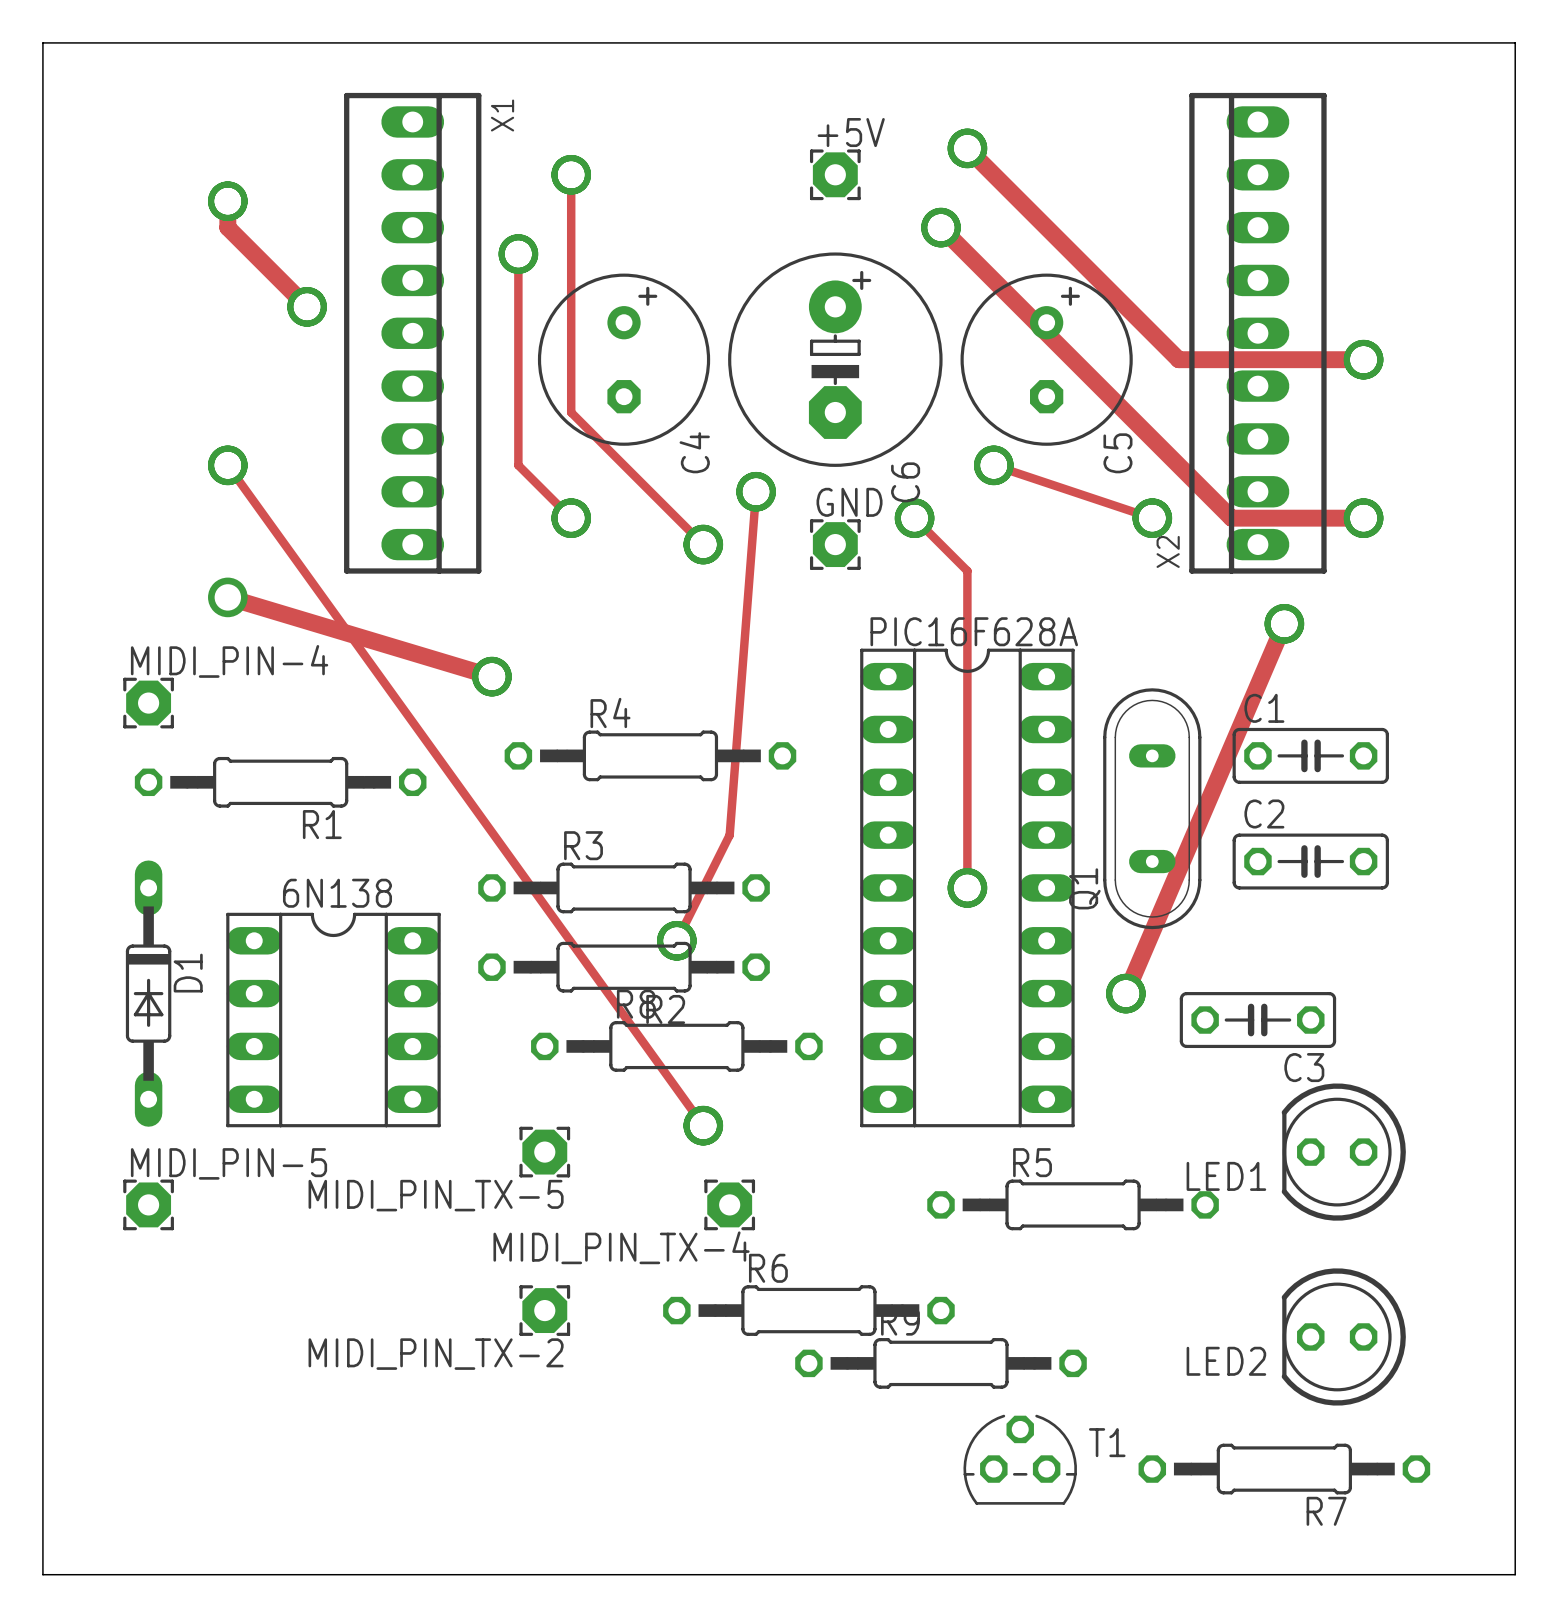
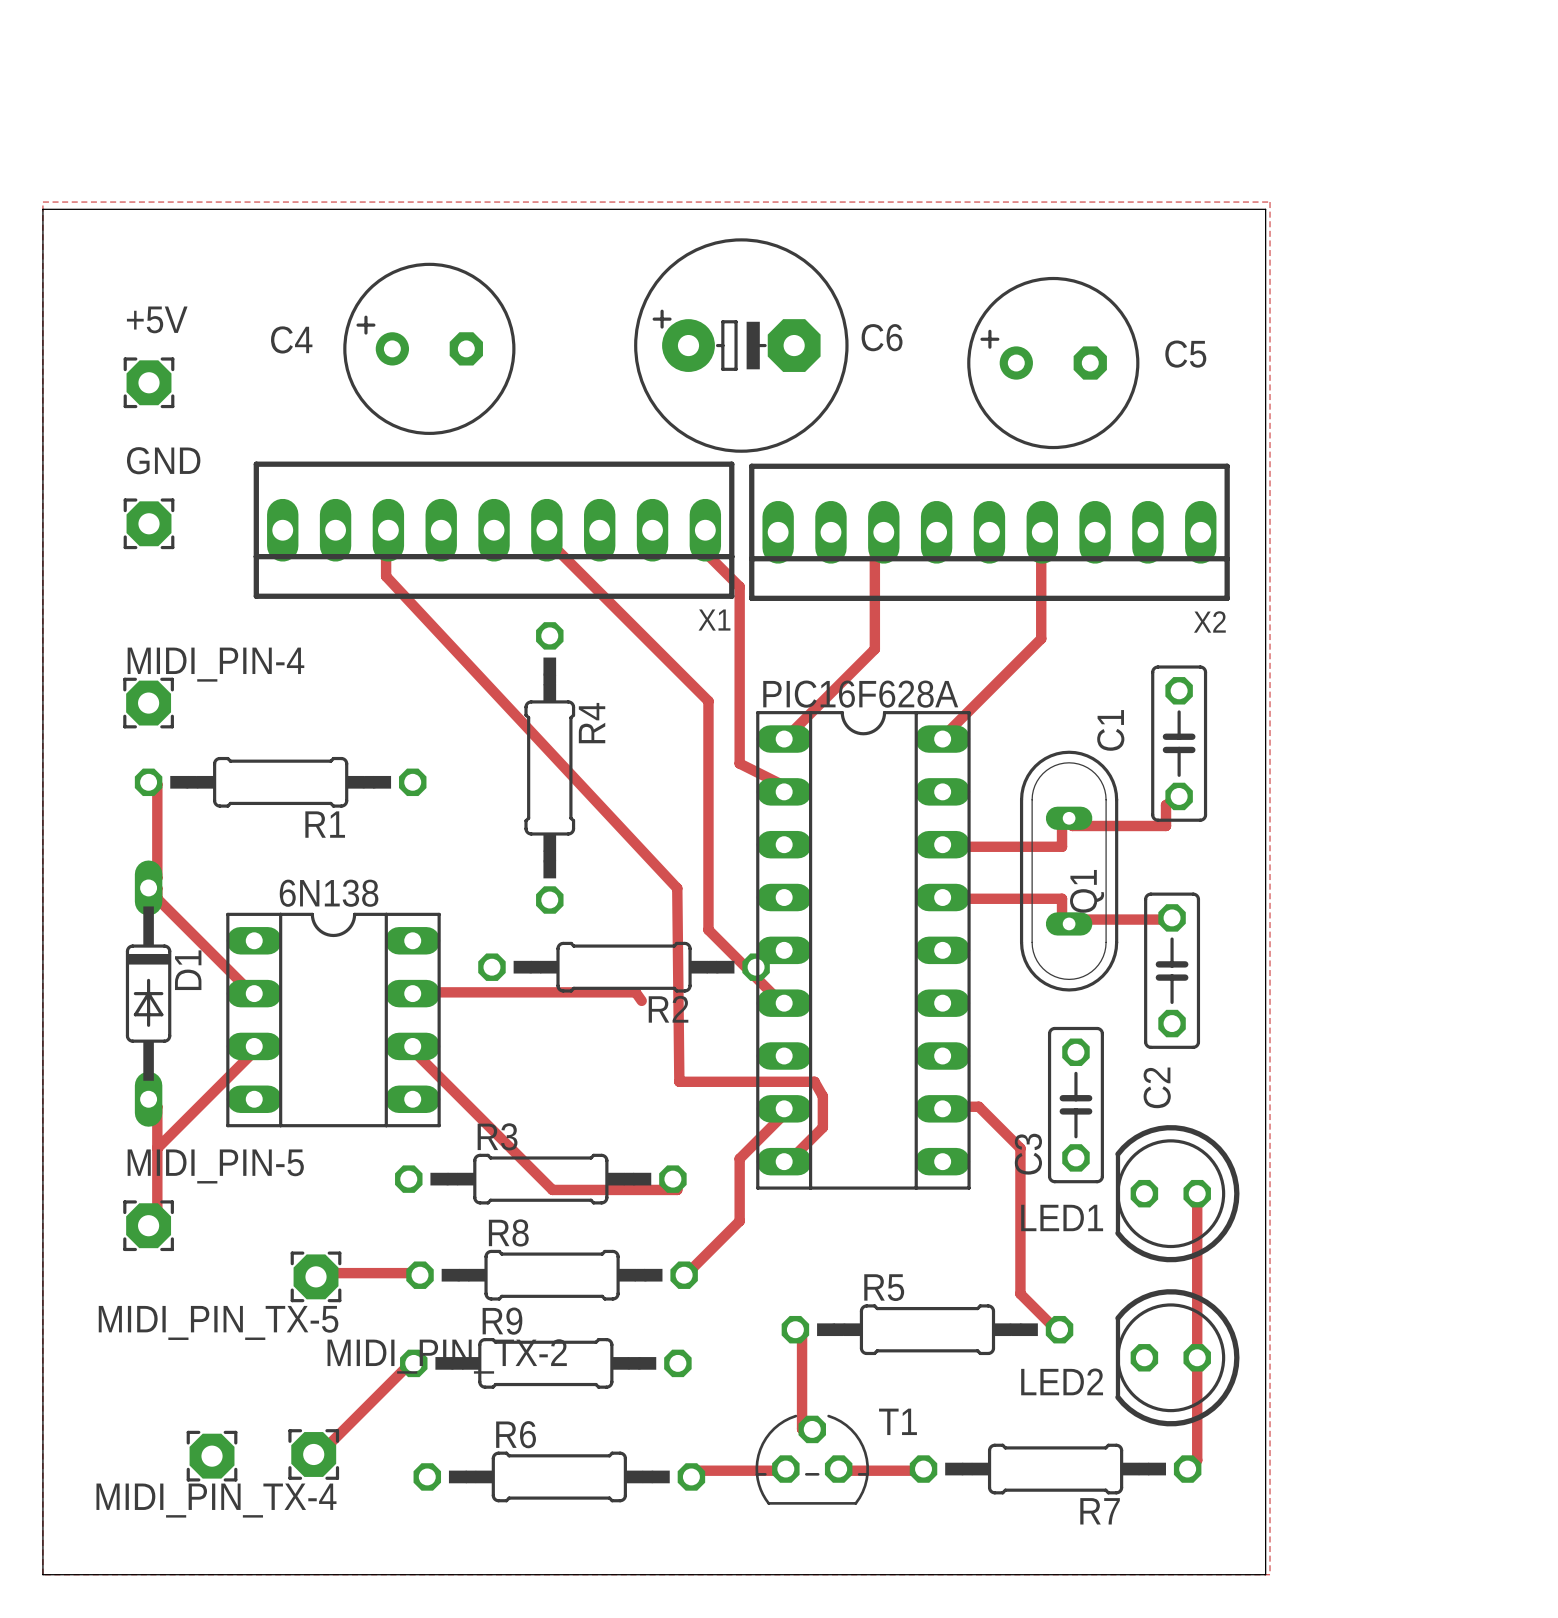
+5V name position: +5V (851, 132) -> +5V (157, 319)
track: (967, 148) (1178, 359) (1363, 359) -> none
via: (967, 148) -> none
track: (571, 174) (571, 412) (703, 544) -> none
via: (571, 174) -> none
+5V position: (835, 174) -> (149, 382)
track: (227, 201) (227, 227) (307, 306) -> none
via: (227, 201) -> none
zone outline: none -> (42, 202) (42, 1574) (1270, 1574) (1270, 202) (42, 202)
board edge: (42, 209) (42, 42) (1515, 42) (1515, 1574) (1265, 1574) -> (42, 209) (1265, 209) (1265, 1574)
track: (940, 227) (1231, 518) (1363, 518) -> none
via: (940, 227) -> none
track: (518, 254) (518, 465) (571, 518) -> none
via: (518, 254) -> none
via: (307, 306) -> none
X1 rotation: 0° (412, 333) -> 90° clockwise (494, 530)
X2 rotation: 0° (1257, 333) -> 90° counterclockwise (989, 532)
X2 position: (1257, 333) -> (989, 532)
C4 rotation: 0° (624, 359) -> 90° counterclockwise (429, 348)
C4 position: (624, 359) -> (429, 348)
C6 rotation: 0° (835, 359) -> 90° counterclockwise (741, 345)
C5 rotation: 0° (1046, 359) -> 90° counterclockwise (1053, 363)
via: (1363, 359) -> none
C4 name position: C4 (694, 452) -> C4 (291, 339)
C5 name position: C5 (1117, 453) -> C5 (1185, 354)
track: (227, 465) (703, 1125) -> none
via: (227, 465) -> none
track: (993, 465) (1152, 518) -> none
via: (993, 465) -> none
C6 name position: C6 (905, 482) -> C6 (882, 337)
track: (756, 491) (729, 835) (676, 940) -> none
via: (756, 491) -> none
via: (571, 518) -> none
track: (914, 518) (967, 570) (967, 887) -> none
via: (914, 518) -> none
via: (1152, 518) -> none
via: (1363, 518) -> none
GND: none -> (149, 523)
track: none -> (388, 530) (386, 534) (386, 576) (677, 888) (679, 1081) (814, 1081) (822, 1096) (822, 1127) (791, 1158) (784, 1161)
track: none -> (546, 530) (552, 534) (552, 545) (708, 701) (708, 929) (781, 1002) (784, 1003)
track: none -> (705, 530) (708, 534) (708, 555) (739, 586) (739, 763) (781, 784) (784, 791)
track: none -> (883, 532) (874, 534) (874, 649) (784, 739)
track: none -> (1042, 532) (1041, 638) (942, 739)
via: (703, 544) -> none
GND: (835, 544) -> none
track: (227, 597) (491, 676) -> none
via: (227, 597) -> none
track: (1284, 623) (1125, 993) -> none
via: (1284, 623) -> none
via: (491, 676) -> none
R4 rotation: 0° (650, 755) -> 90° clockwise (549, 767)
C1 rotation: 0° (1310, 755) -> 90° counterclockwise (1179, 743)
C1 position: (1310, 755) -> (1179, 743)
track: none -> (148, 782) (157, 784) (157, 877) (148, 887) (157, 888) (157, 898) (254, 993)
track: none -> (1179, 796) (1166, 805) (1166, 825) (1072, 825) (1069, 818) (1062, 825) (1062, 846) (947, 846) (942, 844)
Q1 position: (1152, 808) -> (1069, 871)
C2 name position: C2 (1264, 814) -> C2 (1157, 1087)
C2 rotation: 0° (1310, 861) -> 90° clockwise (1172, 970)
C2 position: (1310, 861) -> (1172, 970)
R3 position: (624, 887) -> (540, 1179)
PIC16F628A position: (967, 887) -> (863, 950)
via: (967, 887) -> none
track: none -> (942, 897) (1062, 898) (1062, 919) (1069, 923) (1072, 919) (1166, 919) (1172, 917)
via: (676, 940) -> none
track: none -> (412, 993) (635, 992) (641, 1000)
via: (1125, 993) -> none
C3 rotation: 0° (1257, 1020) -> 90° clockwise (1075, 1105)
C3 position: (1257, 1020) -> (1075, 1105)
track: none -> (254, 1046) (250, 1054) (157, 1148)
track: none -> (412, 1046) (417, 1054) (552, 1189) (677, 1189) (677, 1179) (672, 1179)
R8 position: (676, 1046) -> (552, 1275)
track: none -> (148, 1099) (157, 1106) (157, 1221) (148, 1225)
track: none -> (784, 1108) (781, 1117) (739, 1158) (739, 1221) (684, 1275)
track: none -> (942, 1108) (947, 1106) (978, 1106) (1020, 1148) (1020, 1293) (1051, 1325) (1059, 1329)
via: (703, 1125) -> none
MIDI_PIN_TX-5 position: (544, 1152) -> (316, 1276)
LED1 position: (1343, 1152) -> (1177, 1193)
track: none -> (1197, 1193) (1197, 1460) (1187, 1469)
MIDI_PIN-5 position: (148, 1204) -> (148, 1225)
MIDI_PIN_TX-4 position: (729, 1204) -> (313, 1454)
R5 position: (1073, 1204) -> (927, 1329)
track: none -> (420, 1275) (417, 1273) (323, 1273) (316, 1276)
MIDI_PIN_TX-2 position: (544, 1310) -> (212, 1456)
R6 position: (808, 1310) -> (559, 1476)
track: none -> (795, 1329) (802, 1335) (802, 1429) (812, 1429)
LED2 position: (1343, 1336) -> (1177, 1357)
track: none -> (413, 1363) (406, 1366) (323, 1449) (313, 1454)
R9 position: (940, 1363) -> (545, 1363)
T1 name position: T1 (1107, 1442) -> T1 (897, 1421)
T1 position: (1020, 1459) -> (812, 1459)
track: none -> (785, 1469) (781, 1470) (698, 1470) (691, 1476)
track: none -> (838, 1469) (843, 1470) (916, 1470) (923, 1469)
R7 position: (1284, 1469) -> (1055, 1469)

